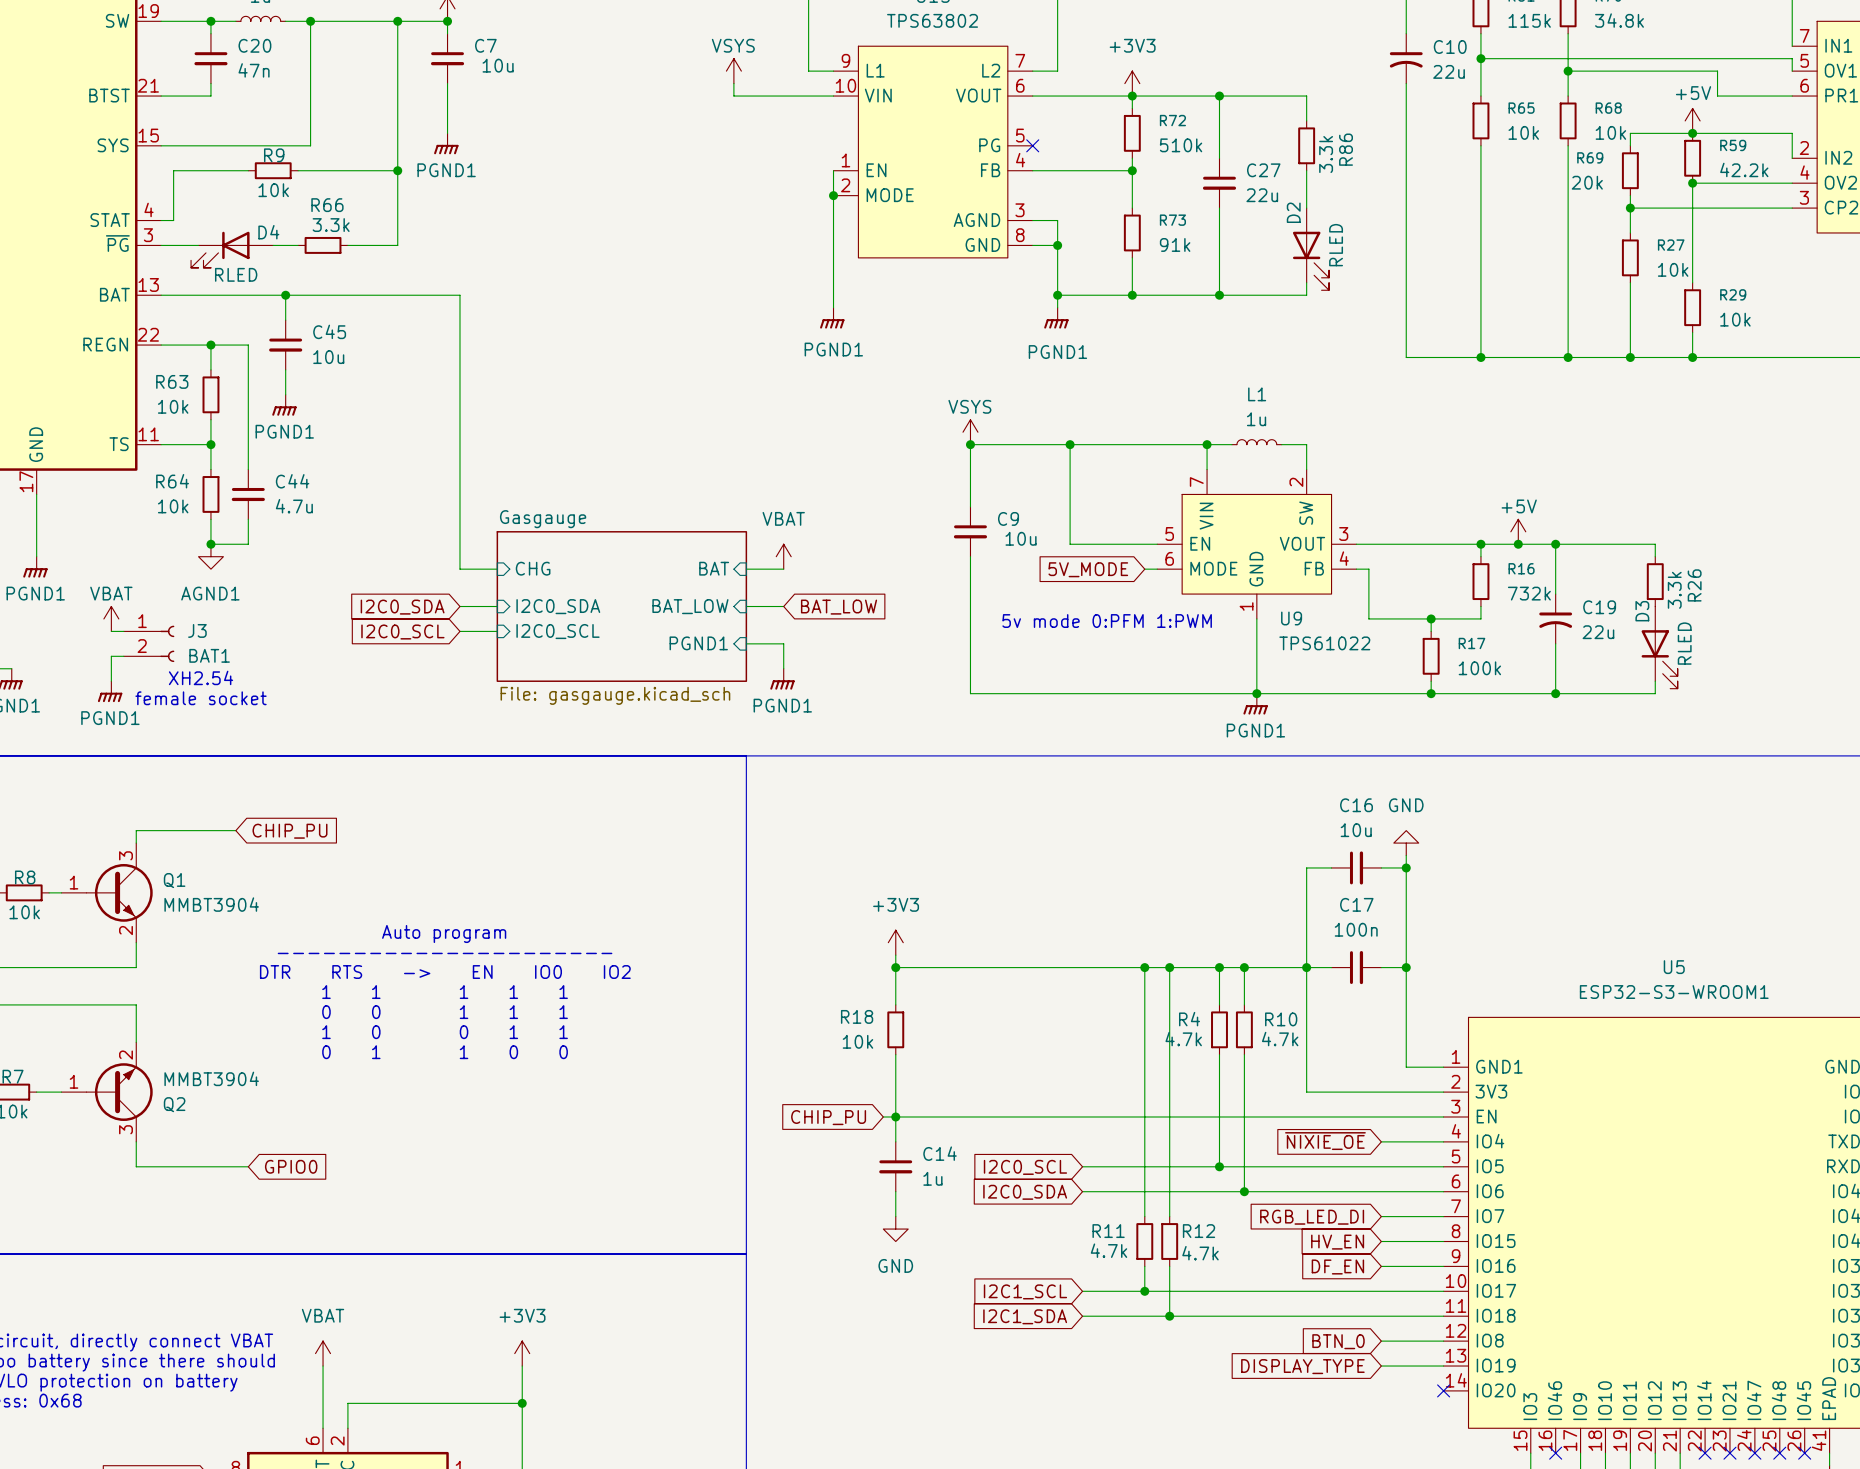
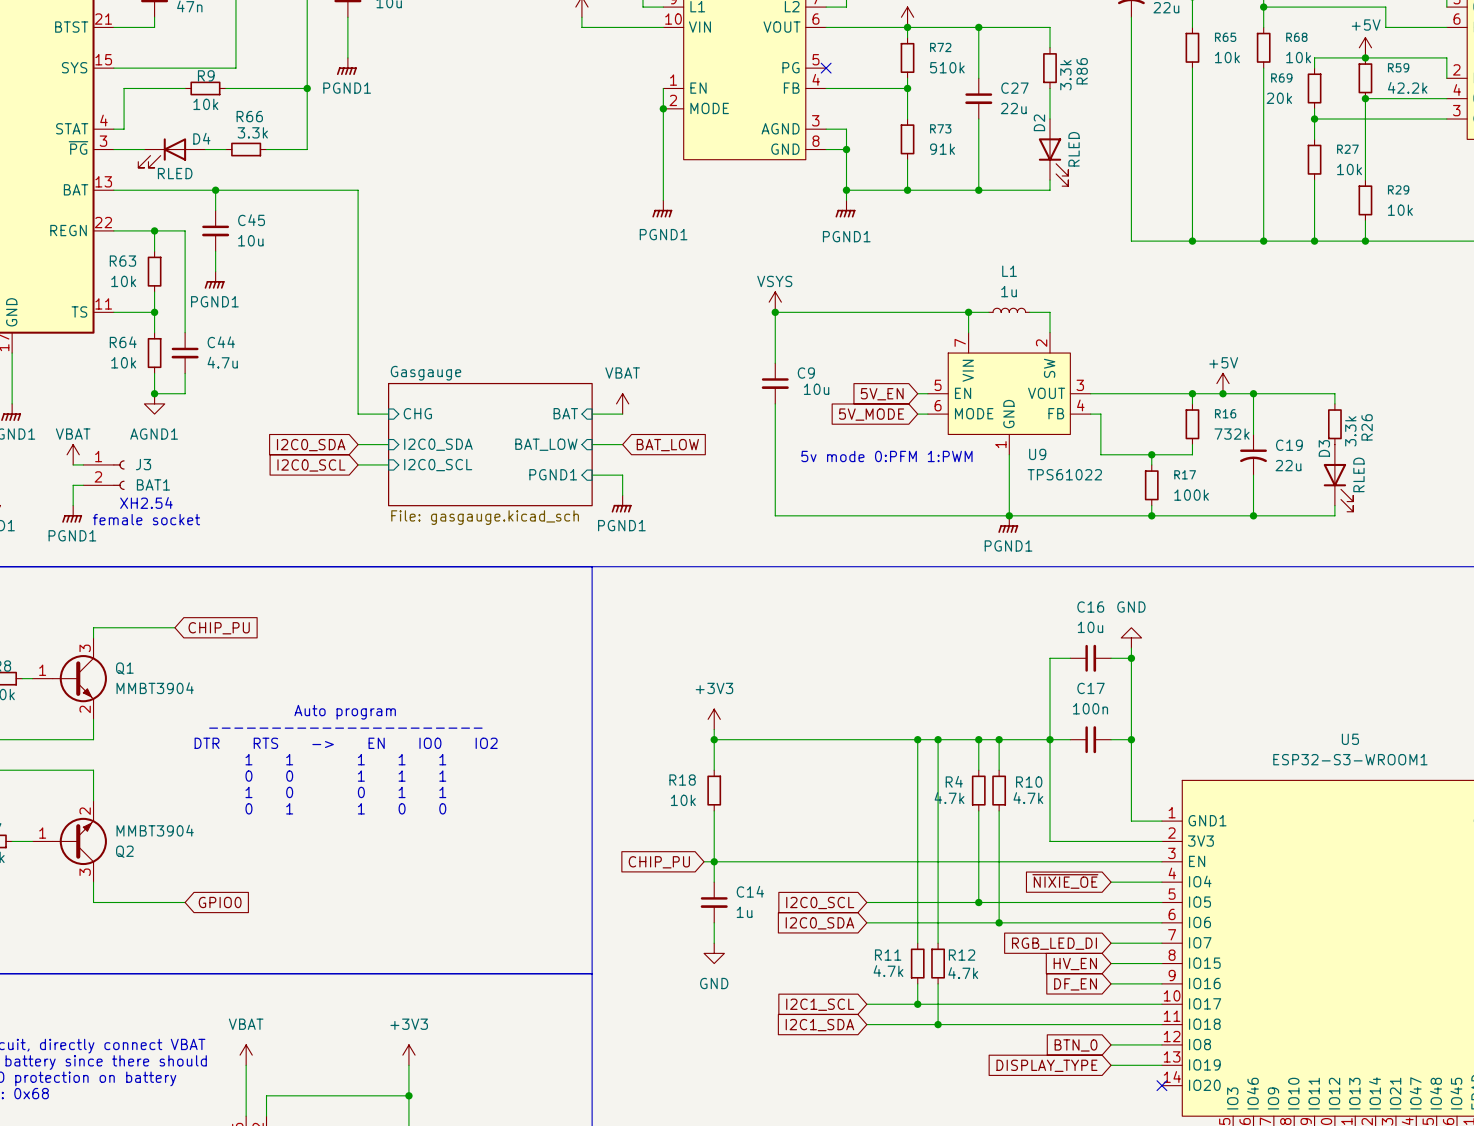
wire: (1070, 444) (1070, 544) (1144, 544) -> none
junction: (1070, 444) -> none
global label: none -> 5V_EN (882, 394)

